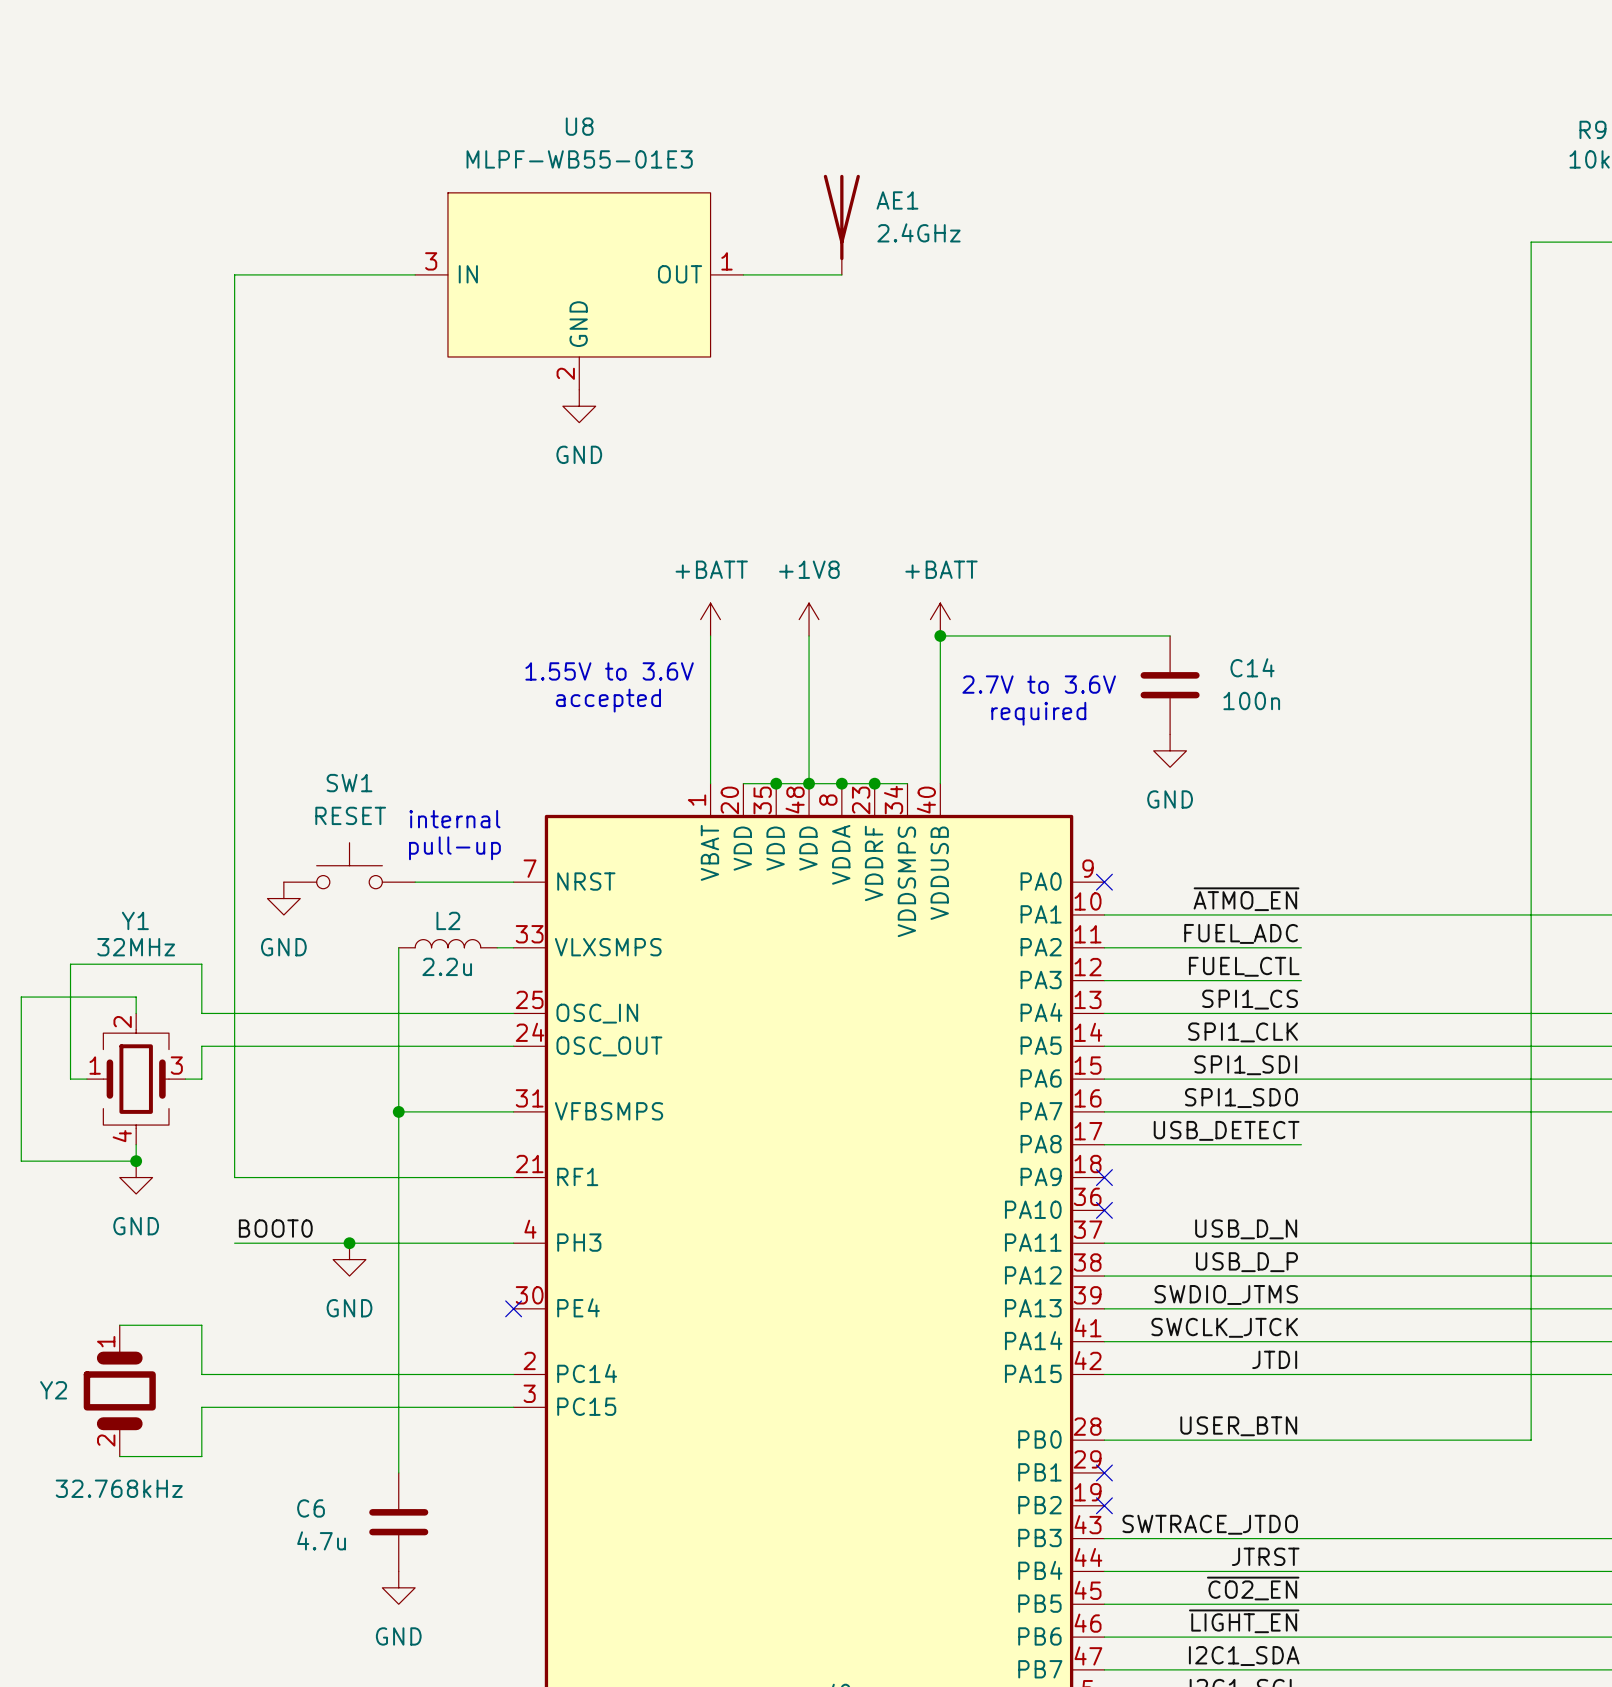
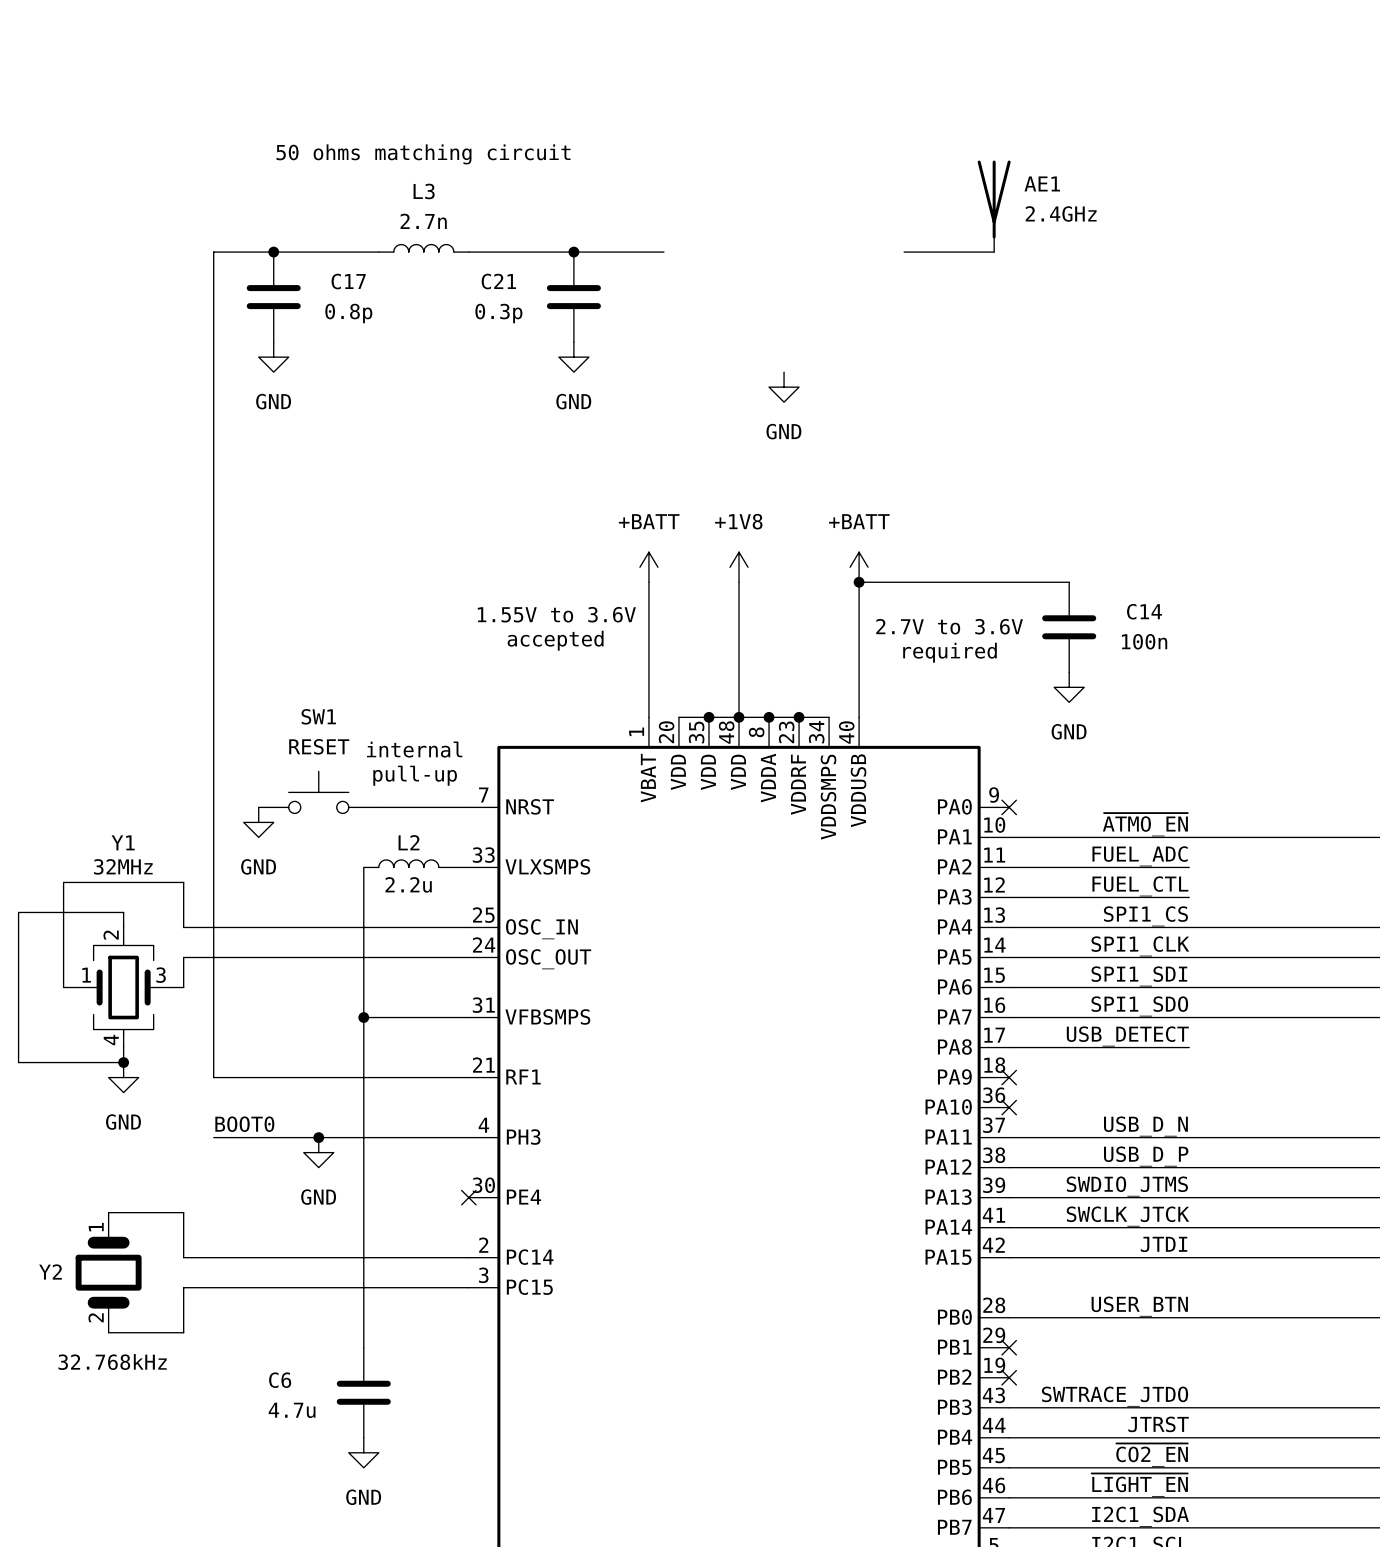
text: none -> 50 ohms matching circuit (423, 154)
AE1 position: (841, 224) -> (994, 206)
L3: none -> 2.7n (423, 248)
junction: none -> (273, 252)
junction: none -> (573, 252)
wire: (743, 274) (841, 274) -> (904, 252) (994, 252)
U8: MLPF-WB55-01E3 (579, 291) -> none
C17: none -> 0.8p (273, 297)
C21: none -> 0.3p (573, 297)
power symbol: none -> GND (273, 357)
power symbol position: GND (579, 406) -> GND (573, 357)
power symbol: none -> GND (784, 387)

